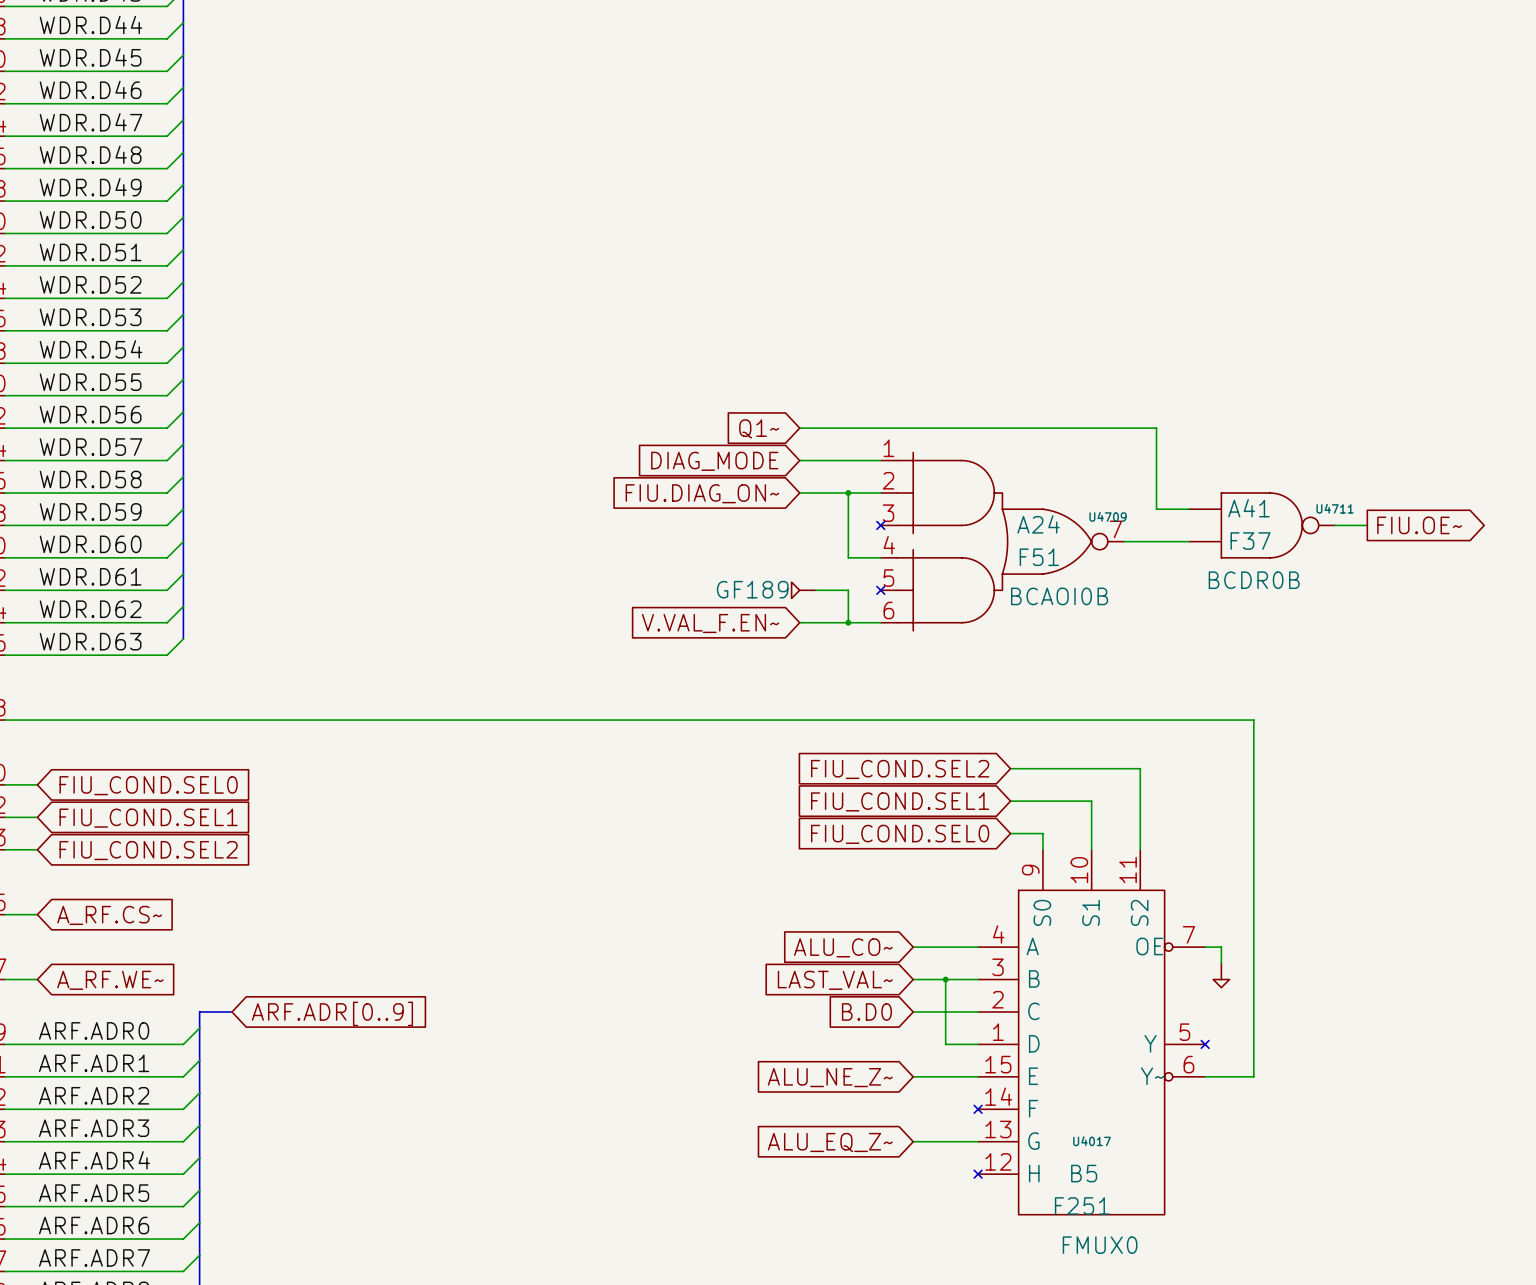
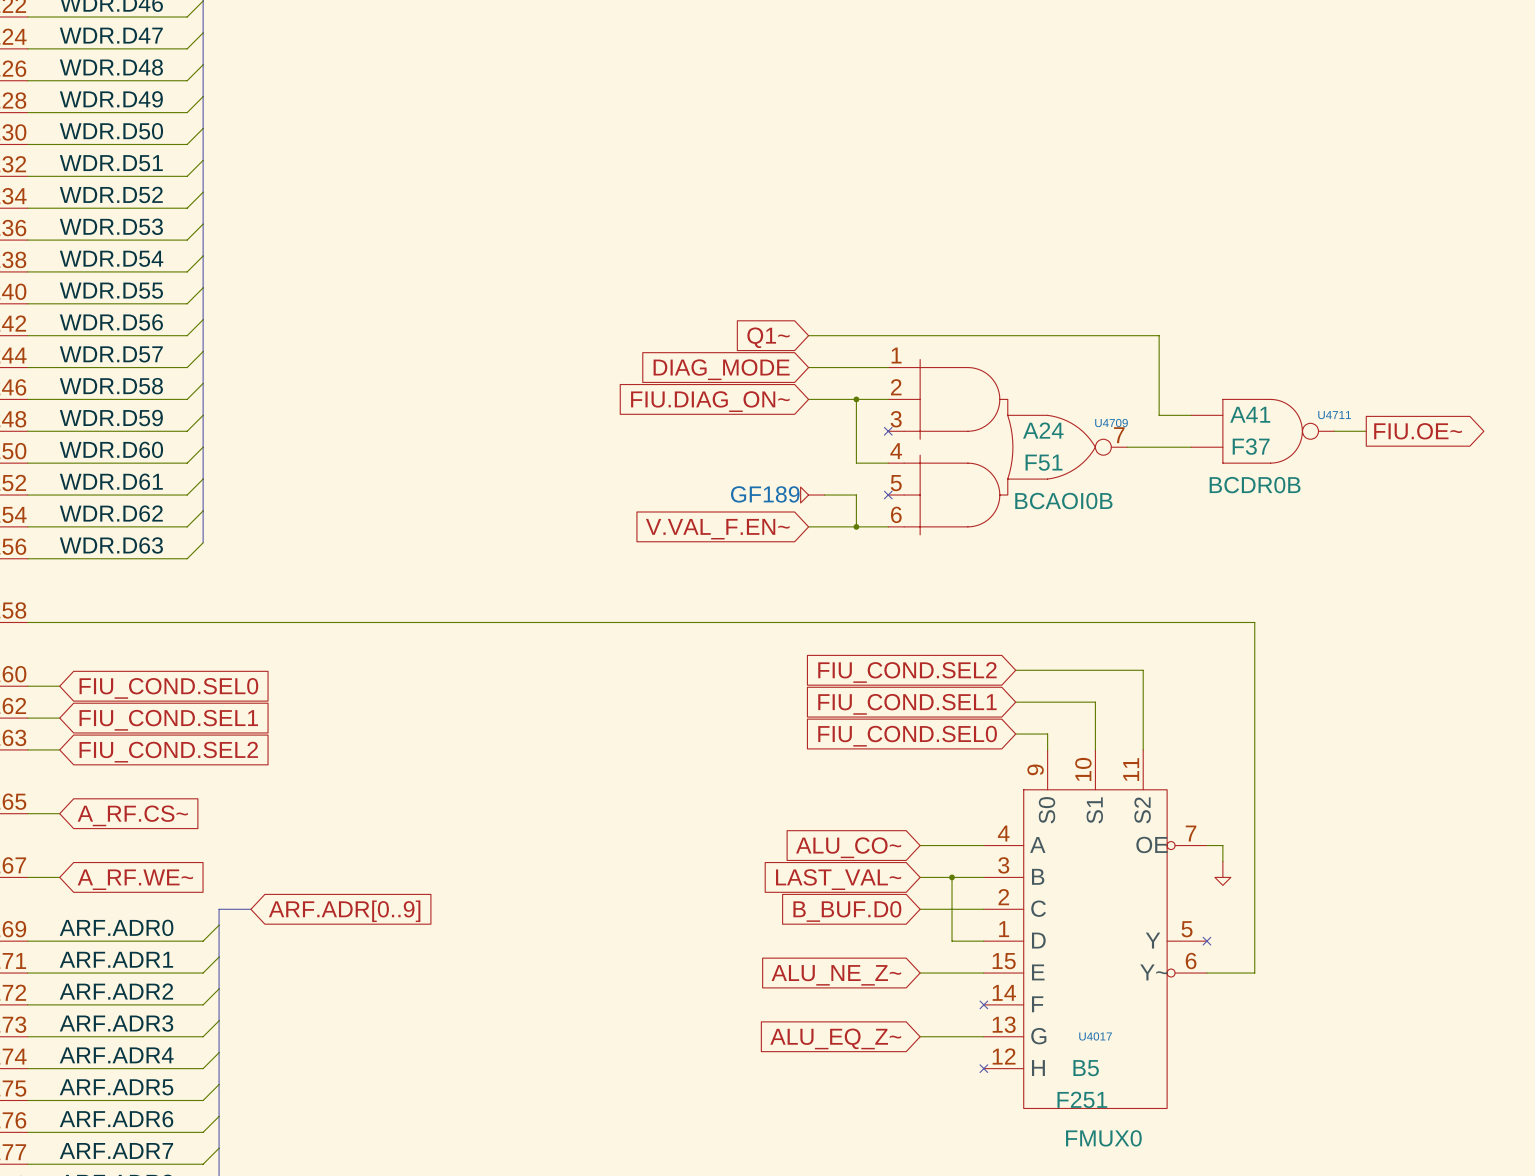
global label: B.D0 (866, 1011) -> B_BUF.D0 (847, 911)

